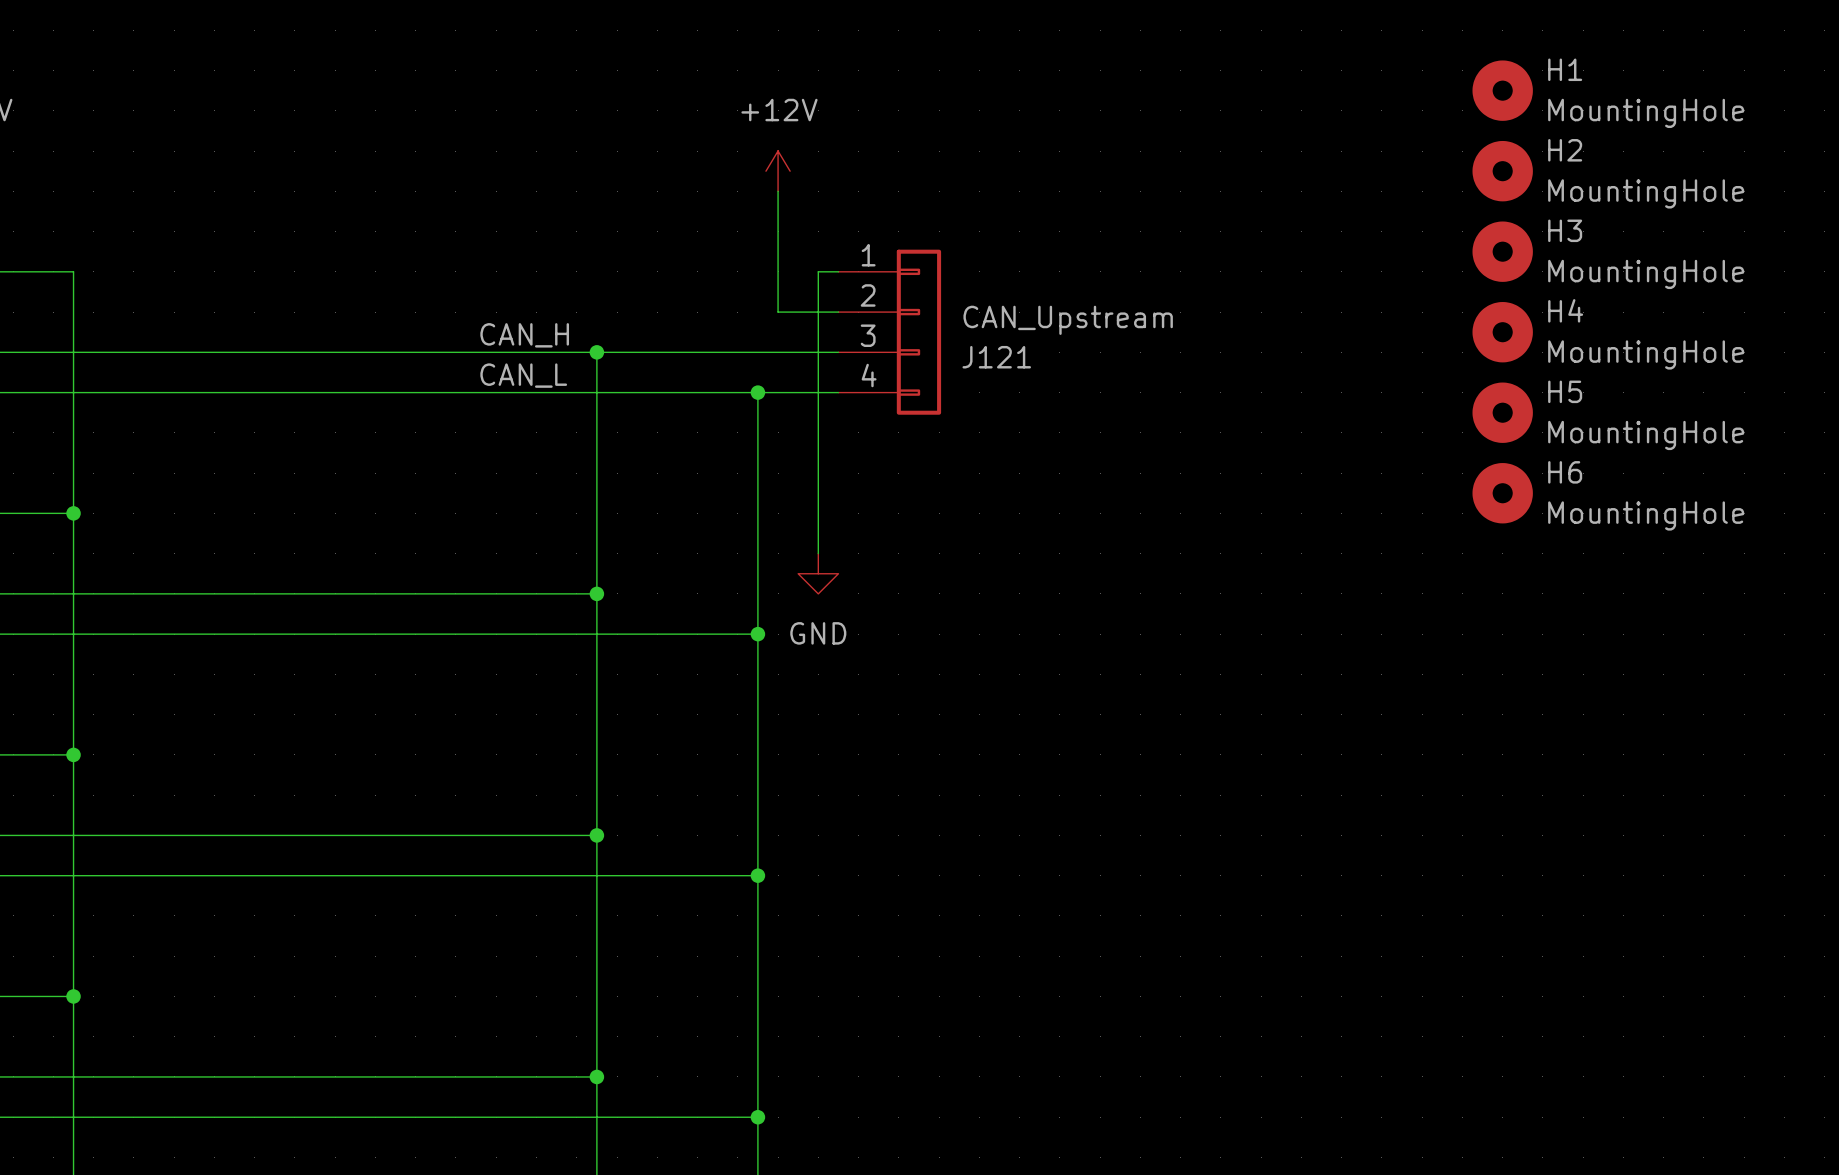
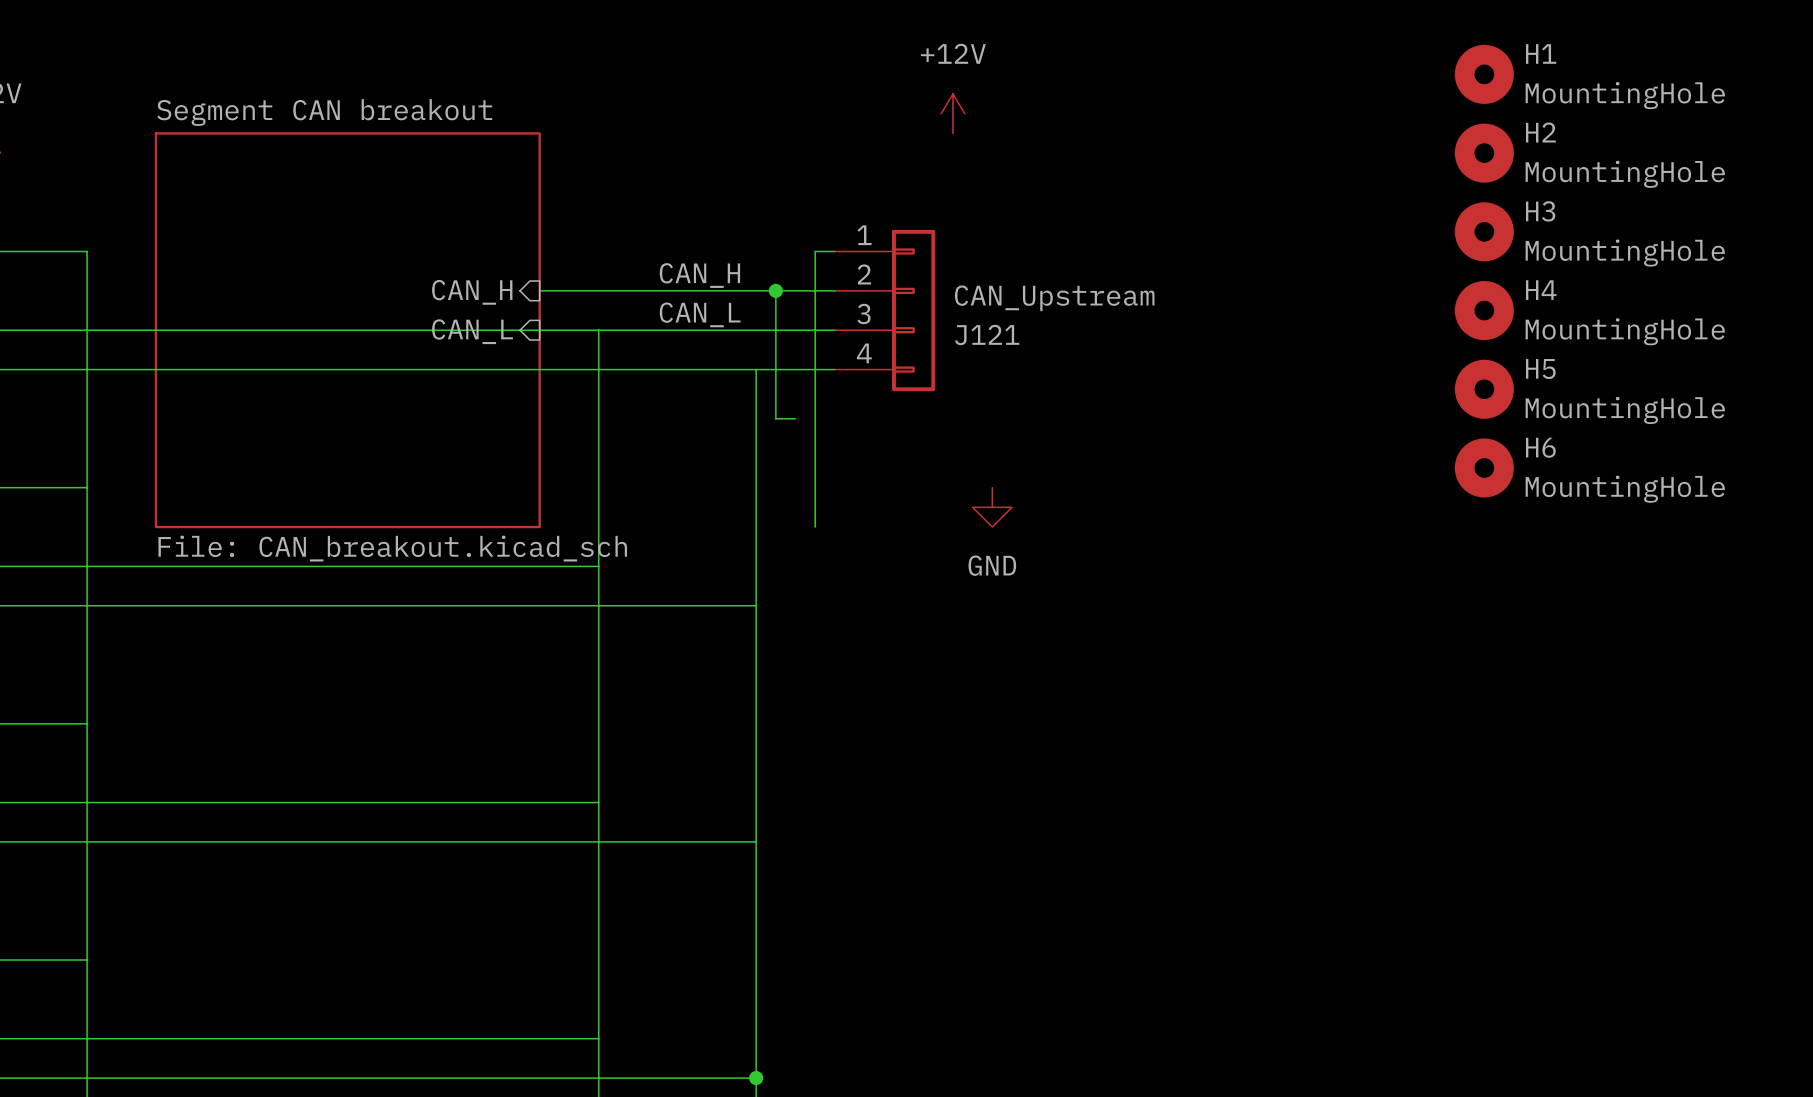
power symbol position: +12V (778, 171) -> +12V (952, 113)
wire: (778, 191) (778, 312) -> none
sheet pin: none -> CAN_H (472, 292)
wire: none -> (539, 290) (775, 290) (775, 418) (795, 418)
label position: CAN_H (524, 335) -> CAN_H (699, 275)
sheet Segment CAN breakout: none -> File: CAN_breakout.kicad_sch (347, 330)
sheet pin: none -> CAN_L (472, 331)
junction: (596, 352) -> none
label position: CAN_L (523, 375) -> CAN_L (700, 314)
junction position: (757, 392) -> (775, 290)
junction: (73, 513) -> none
power symbol position: GND (818, 573) -> GND (992, 507)
junction: (596, 593) -> none
junction: (757, 634) -> none
junction: (73, 754) -> none
junction: (596, 835) -> none
junction: (757, 875) -> none
junction: (73, 996) -> none
junction: (596, 1076) -> none

